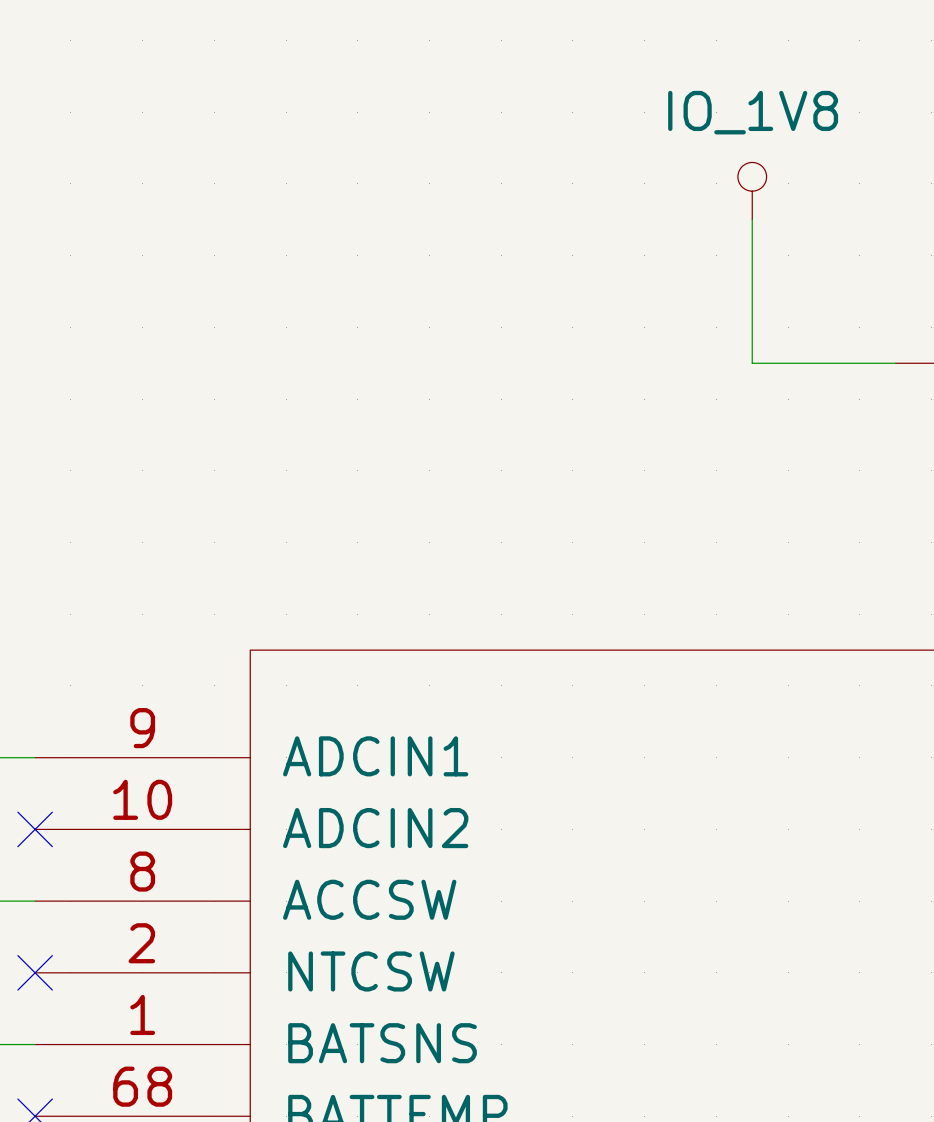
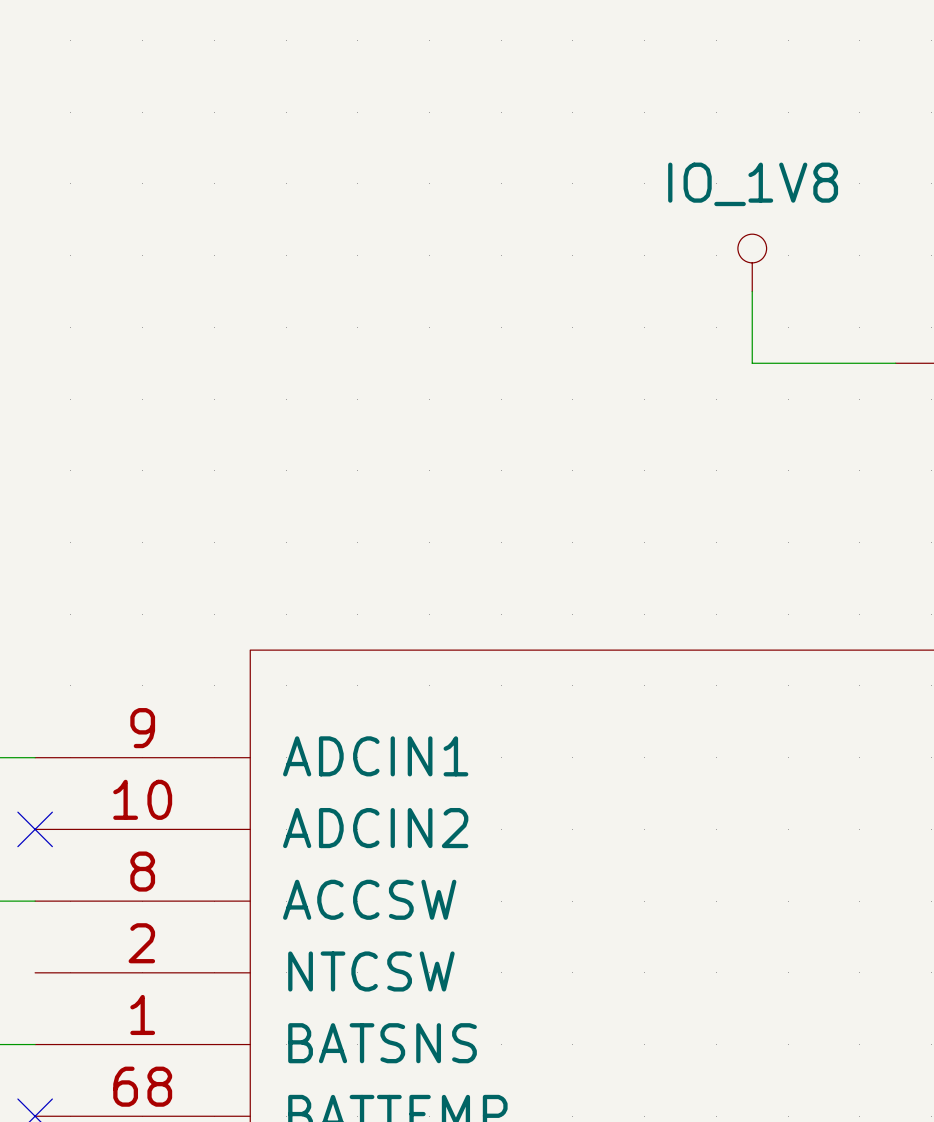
power symbol position: IO_1V8 (752, 191) -> IO_1V8 (752, 262)
wire: (752, 219) (752, 291) -> none
no-connect mark: (35, 972) -> none

